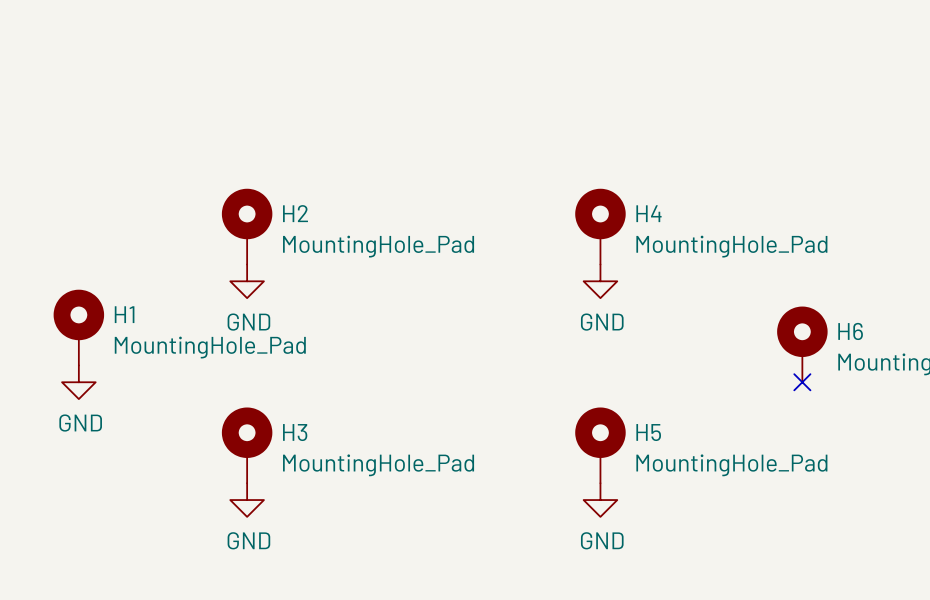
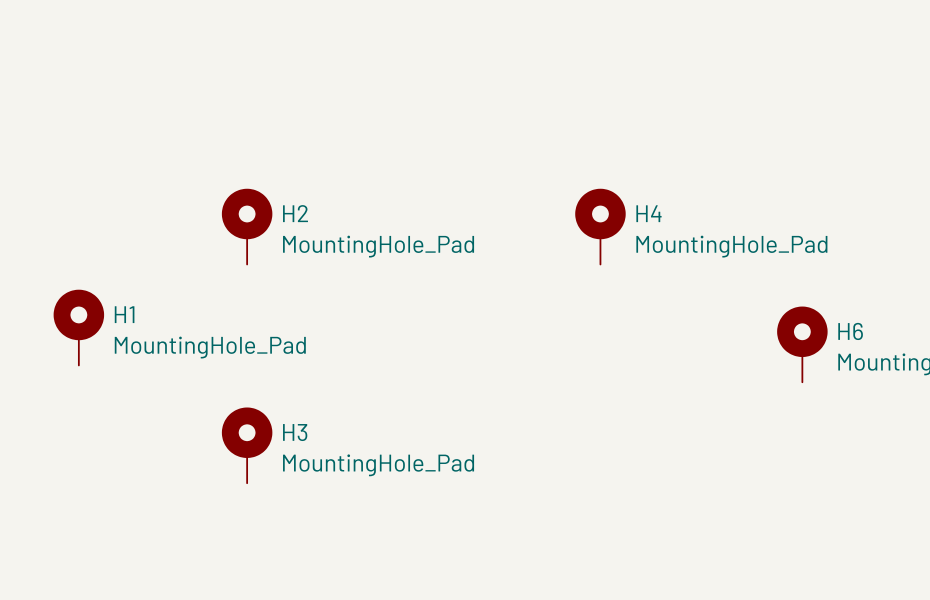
power symbol: GND (247, 281) -> none
power symbol: GND (600, 281) -> none
power symbol: GND (78, 382) -> none
no-connect mark: (802, 382) -> none
H5: MountingHole_Pad (600, 445) -> none
power symbol: GND (247, 500) -> none
power symbol: GND (600, 500) -> none

